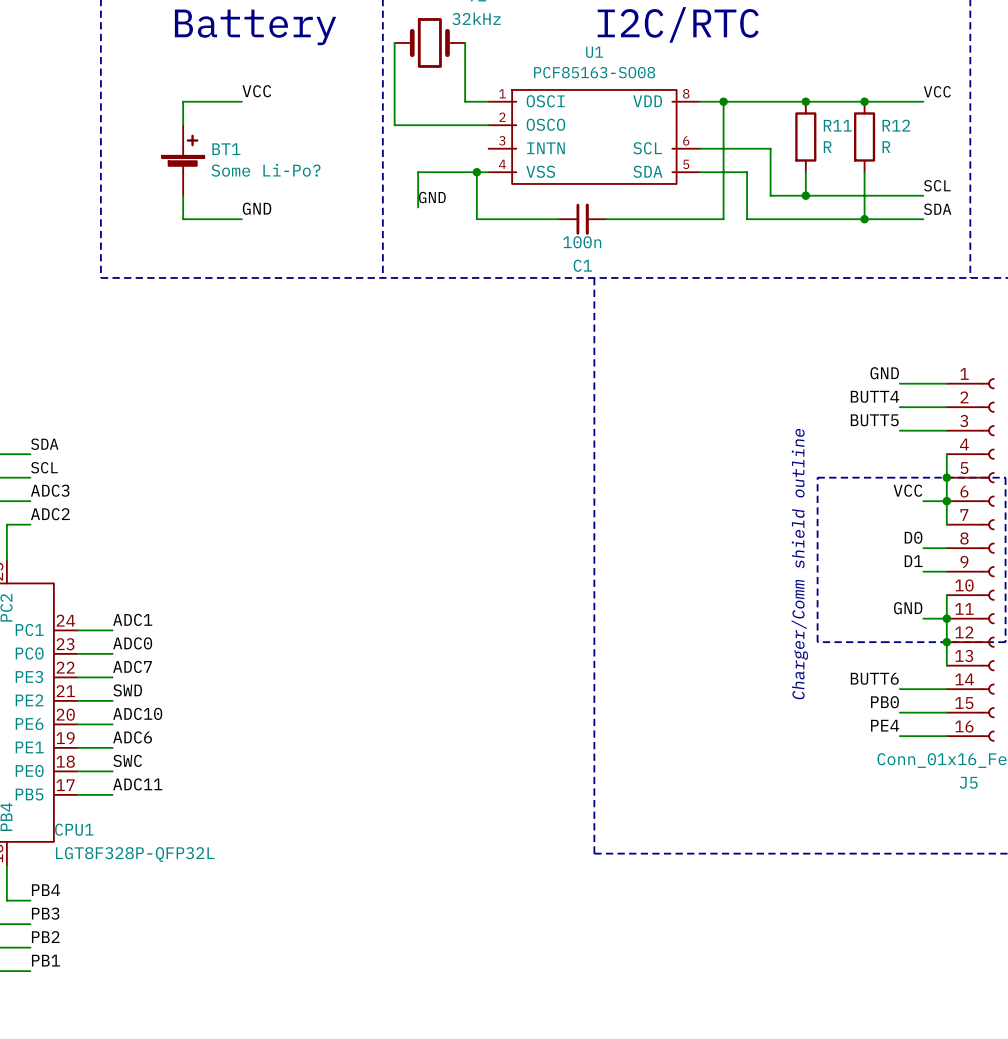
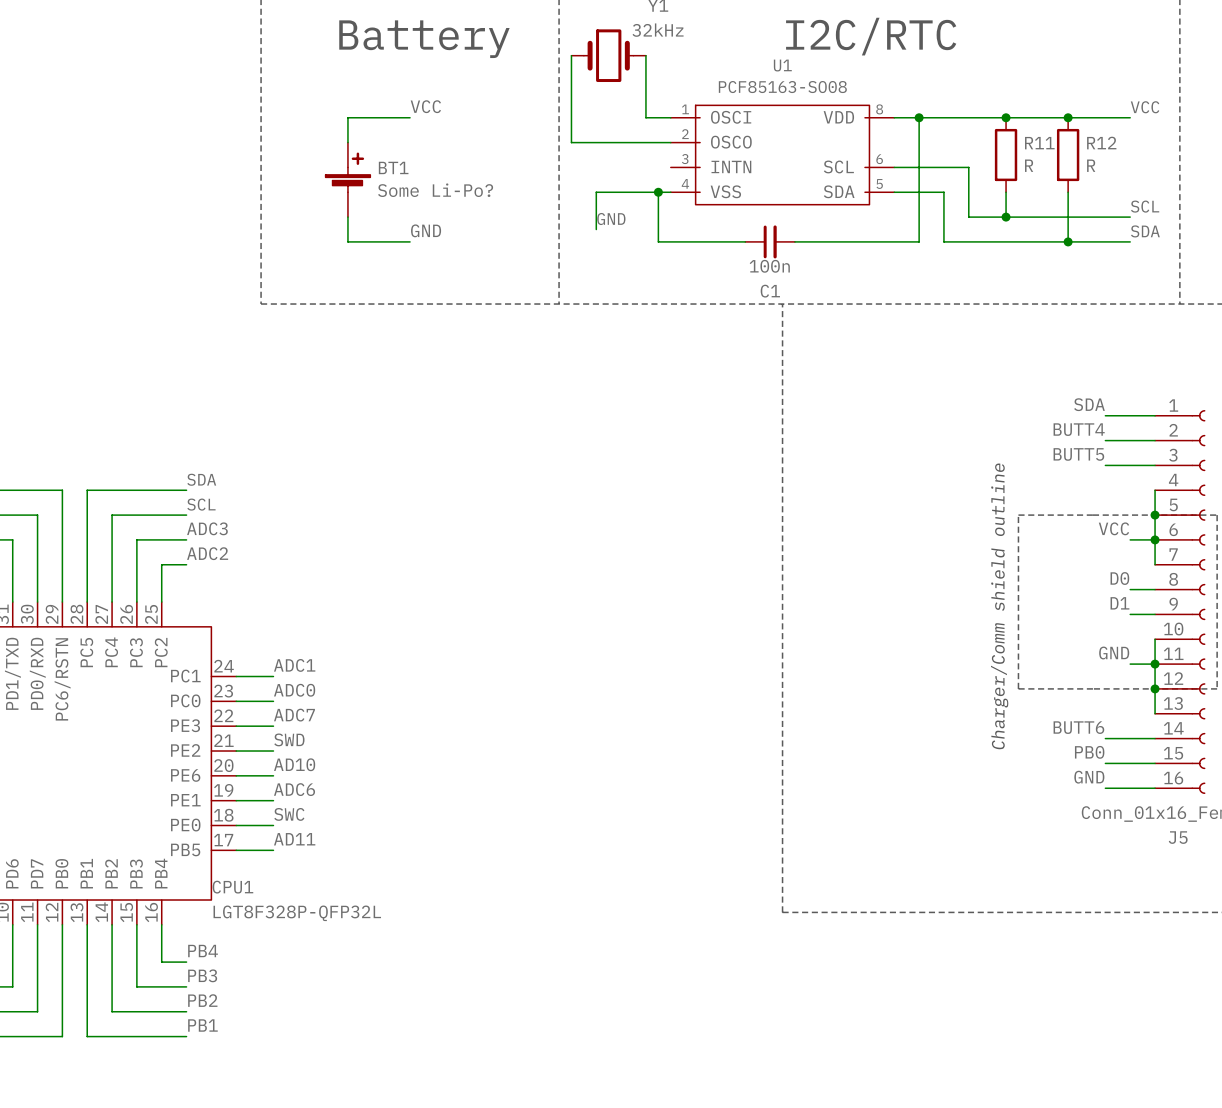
label: GND (884, 373) -> SDA (1089, 404)
label: ADC10 (137, 713) -> AD10 (294, 764)
label: PE4 (885, 725) -> GND (1089, 777)
label: ADC11 (137, 784) -> AD11 (294, 839)

